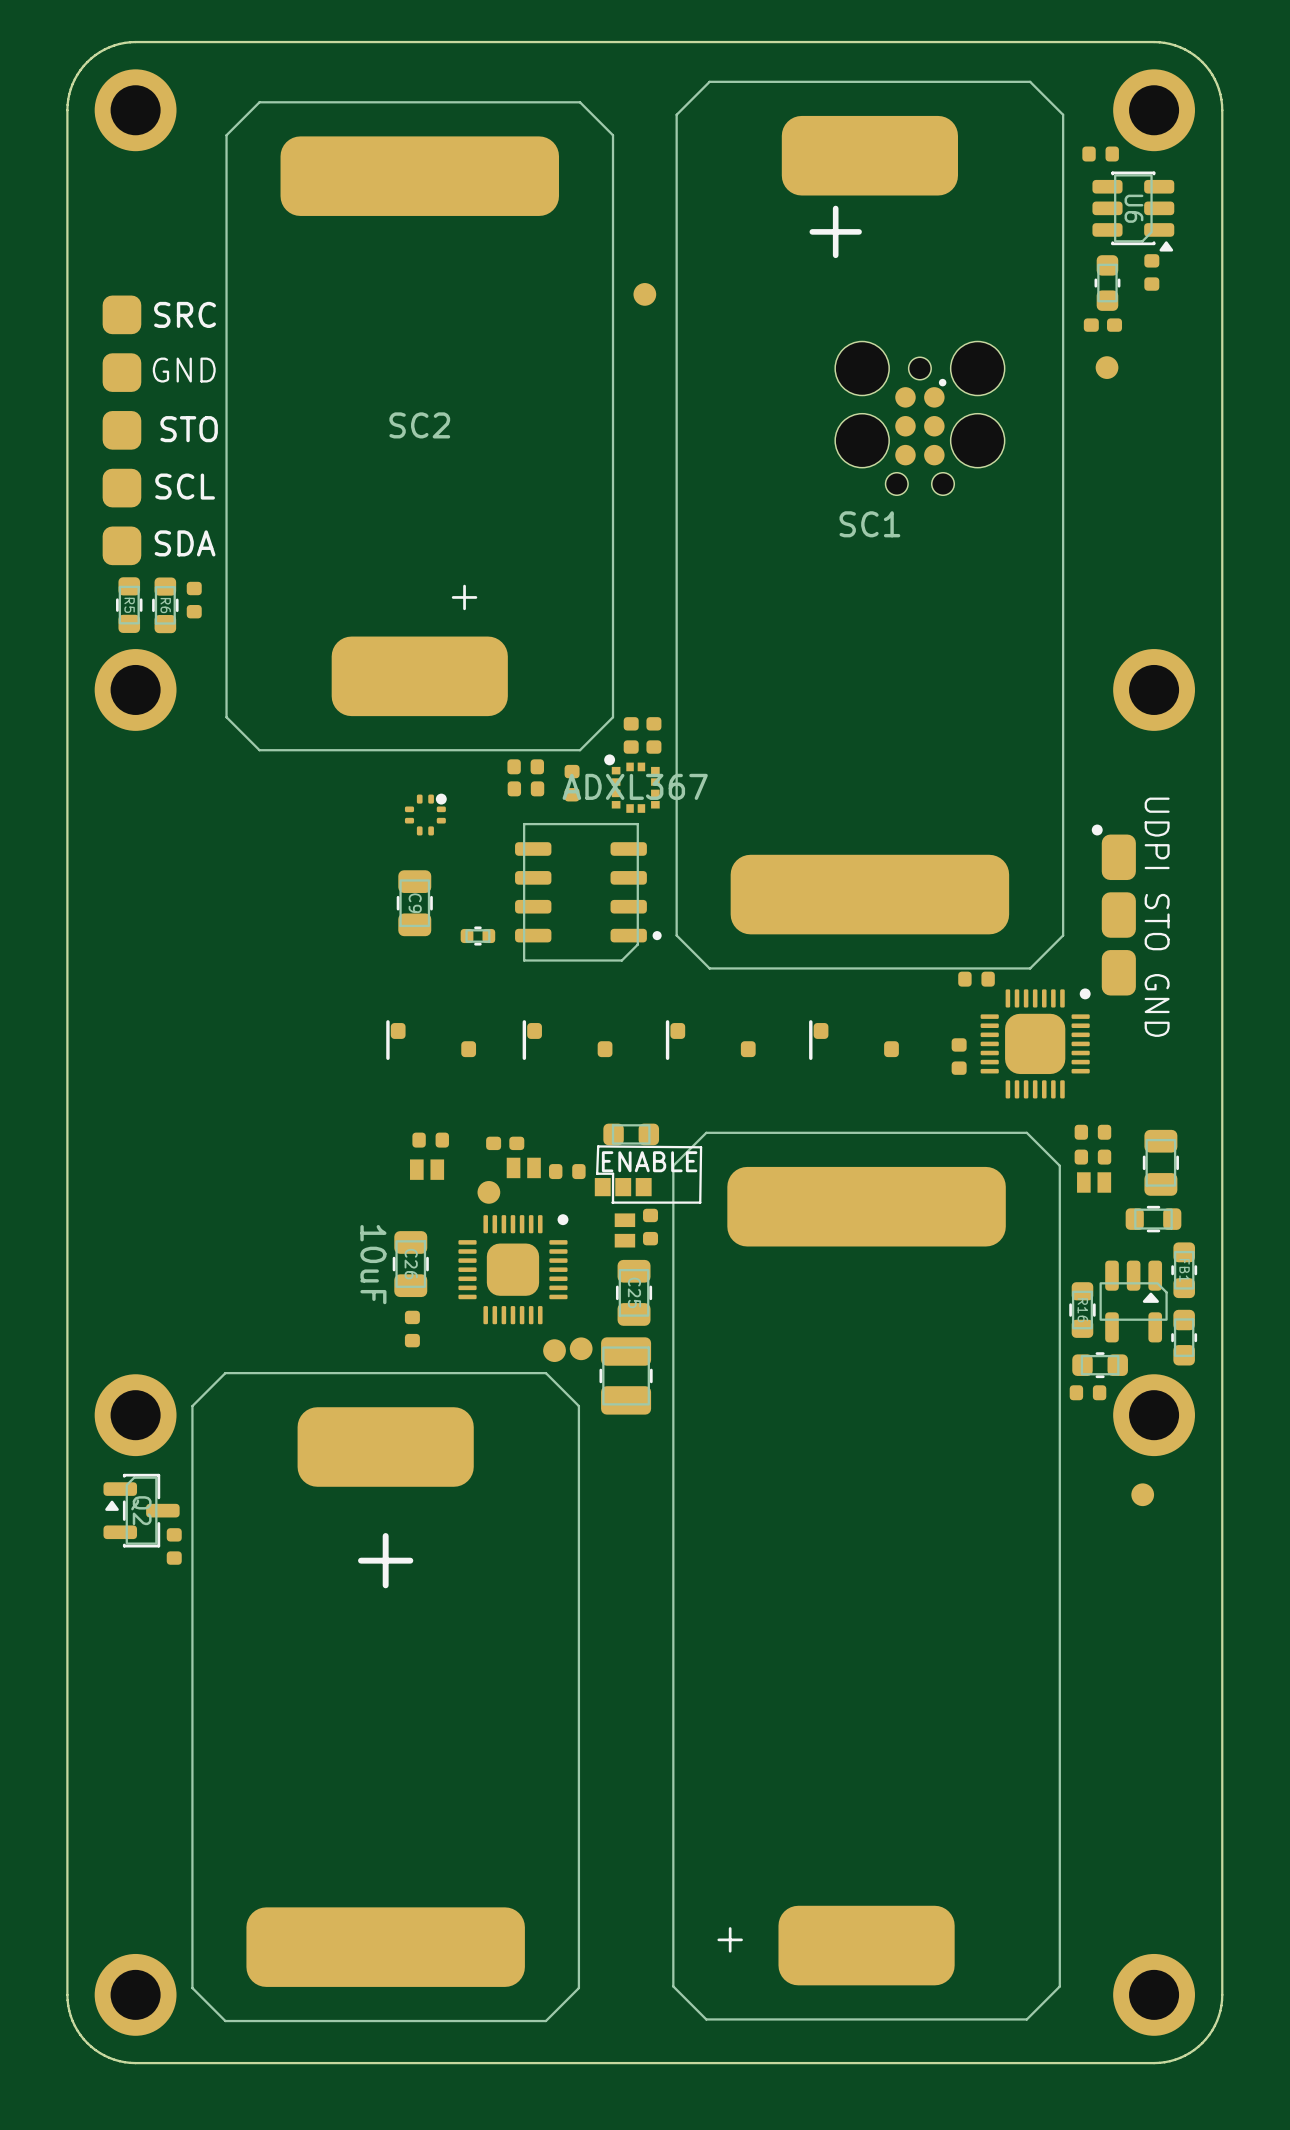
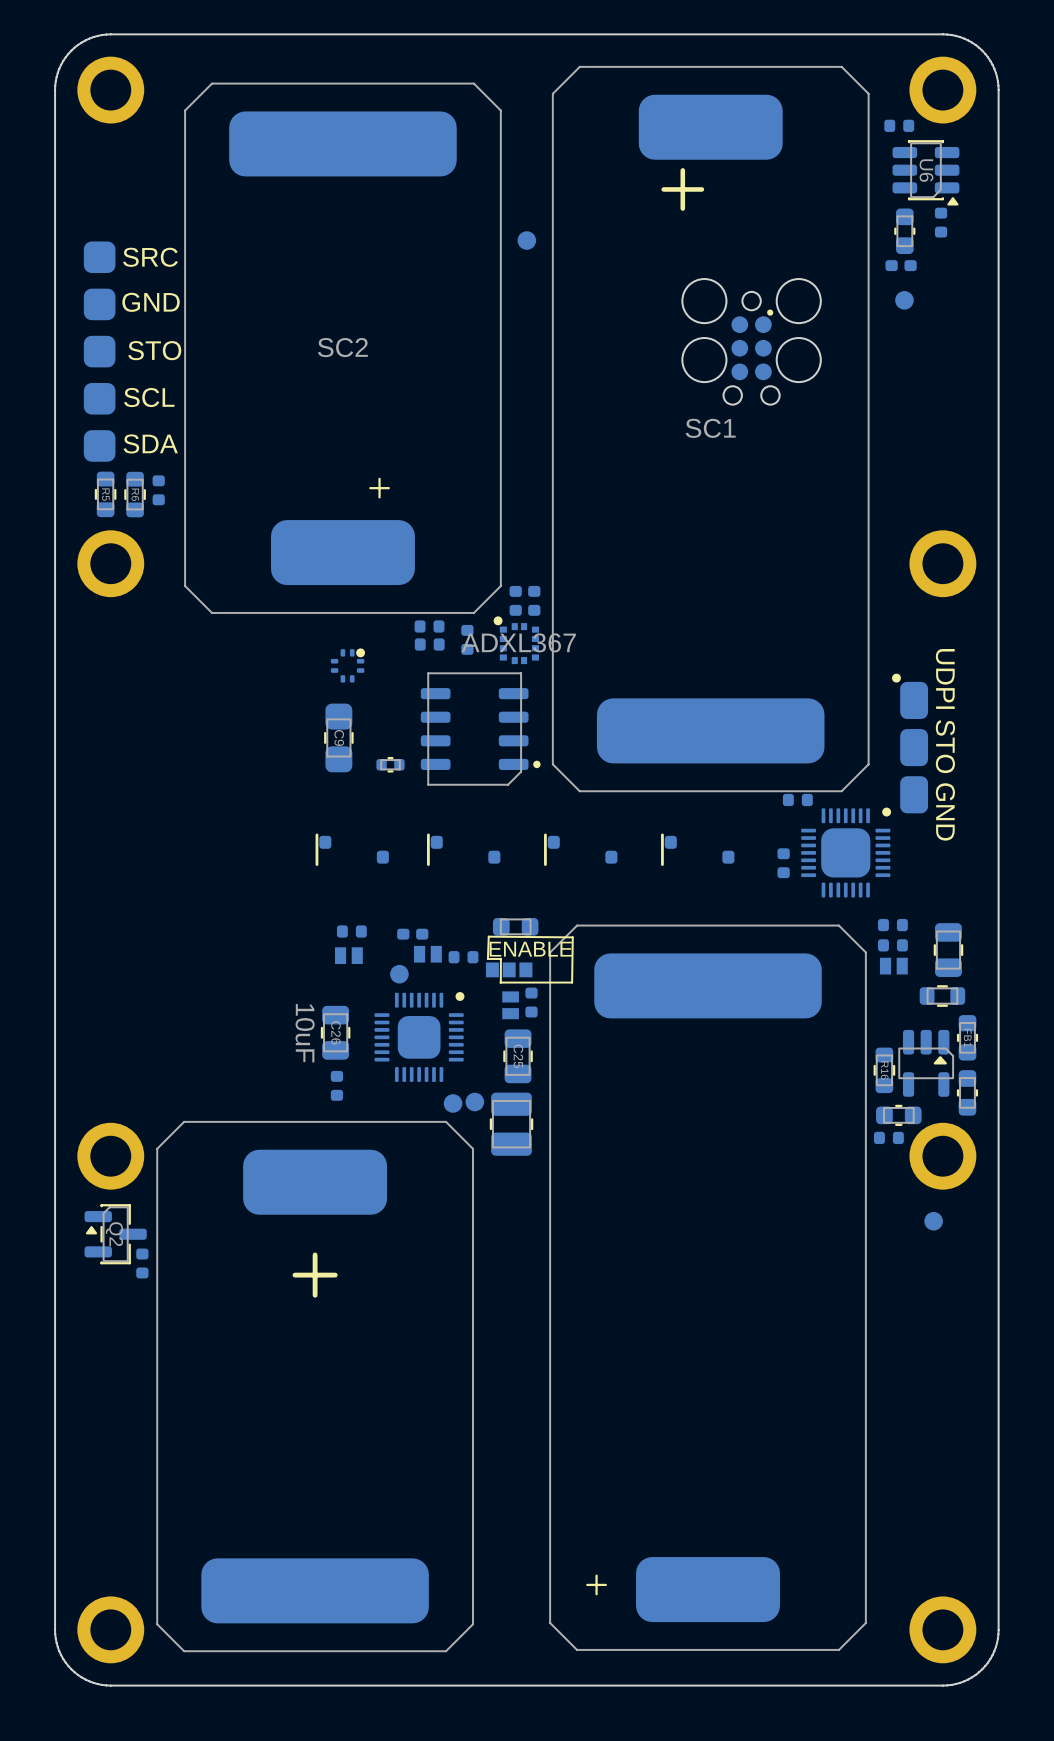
C9 footprint: [396, 870, 433, 937] -> [324, 703, 354, 773]

